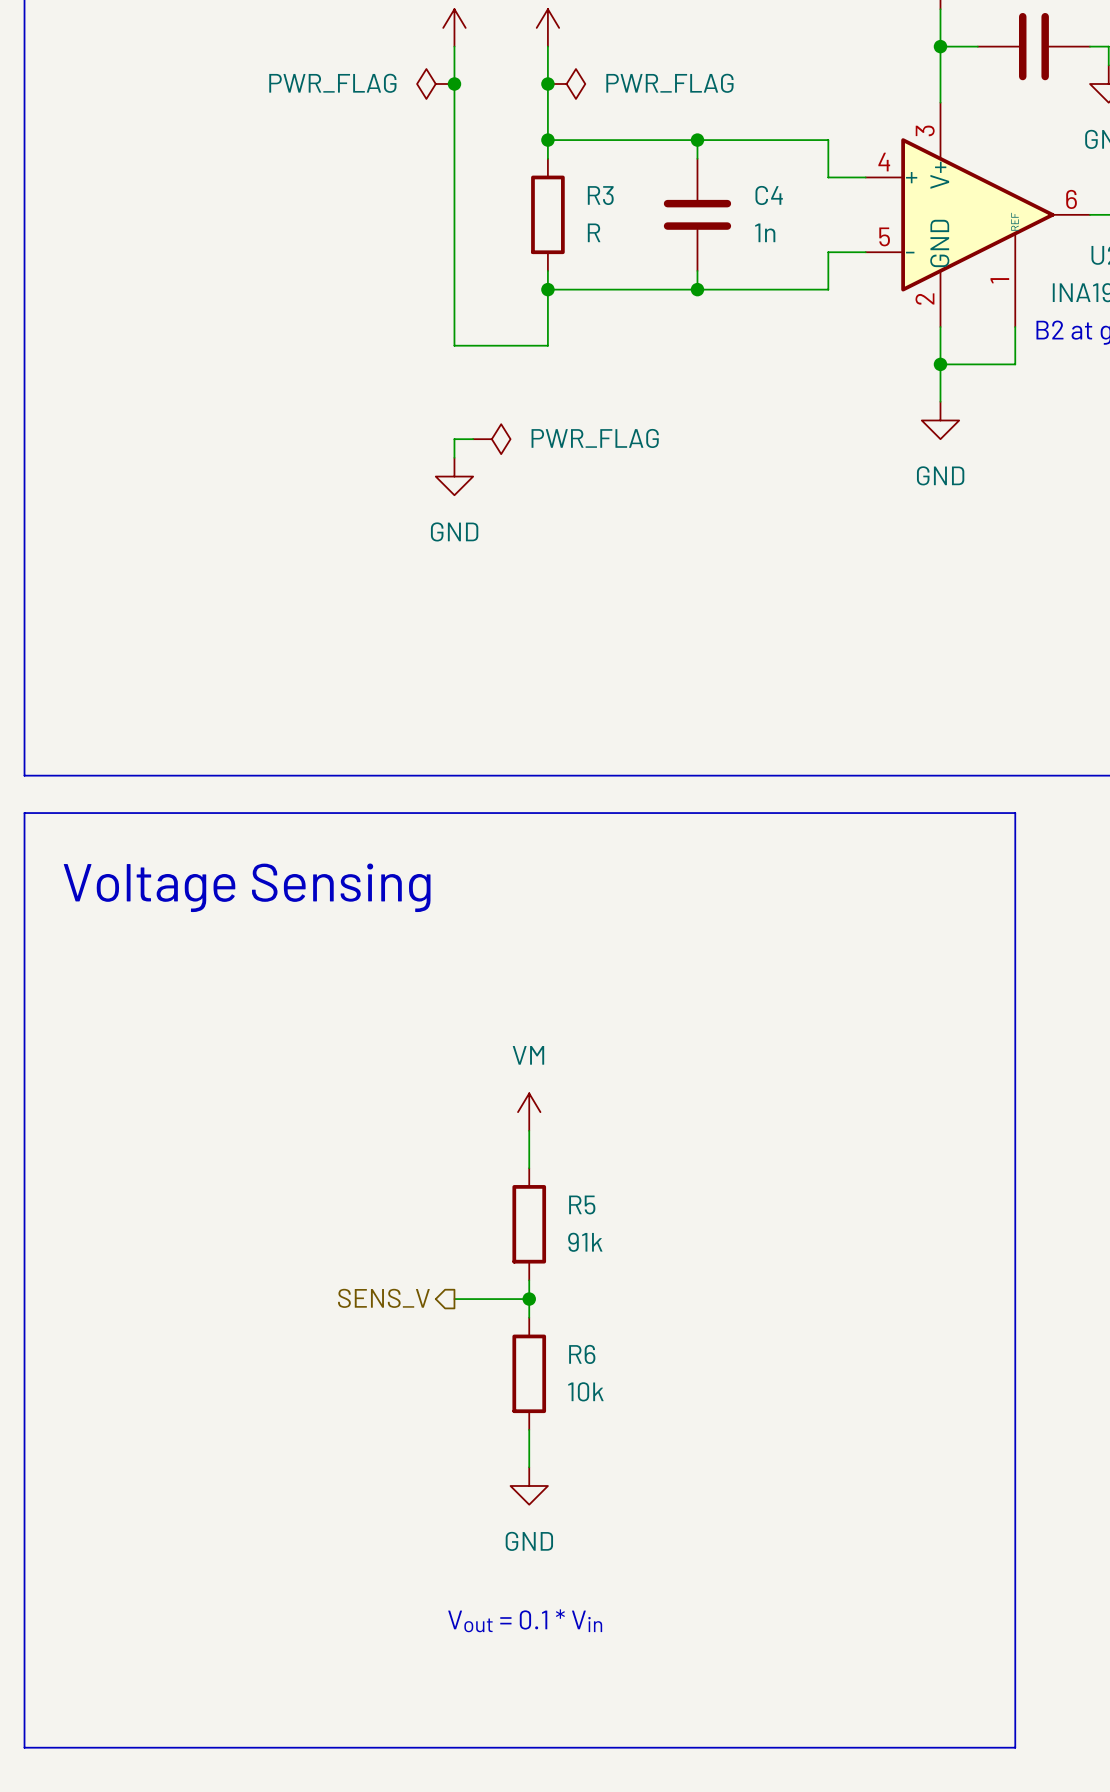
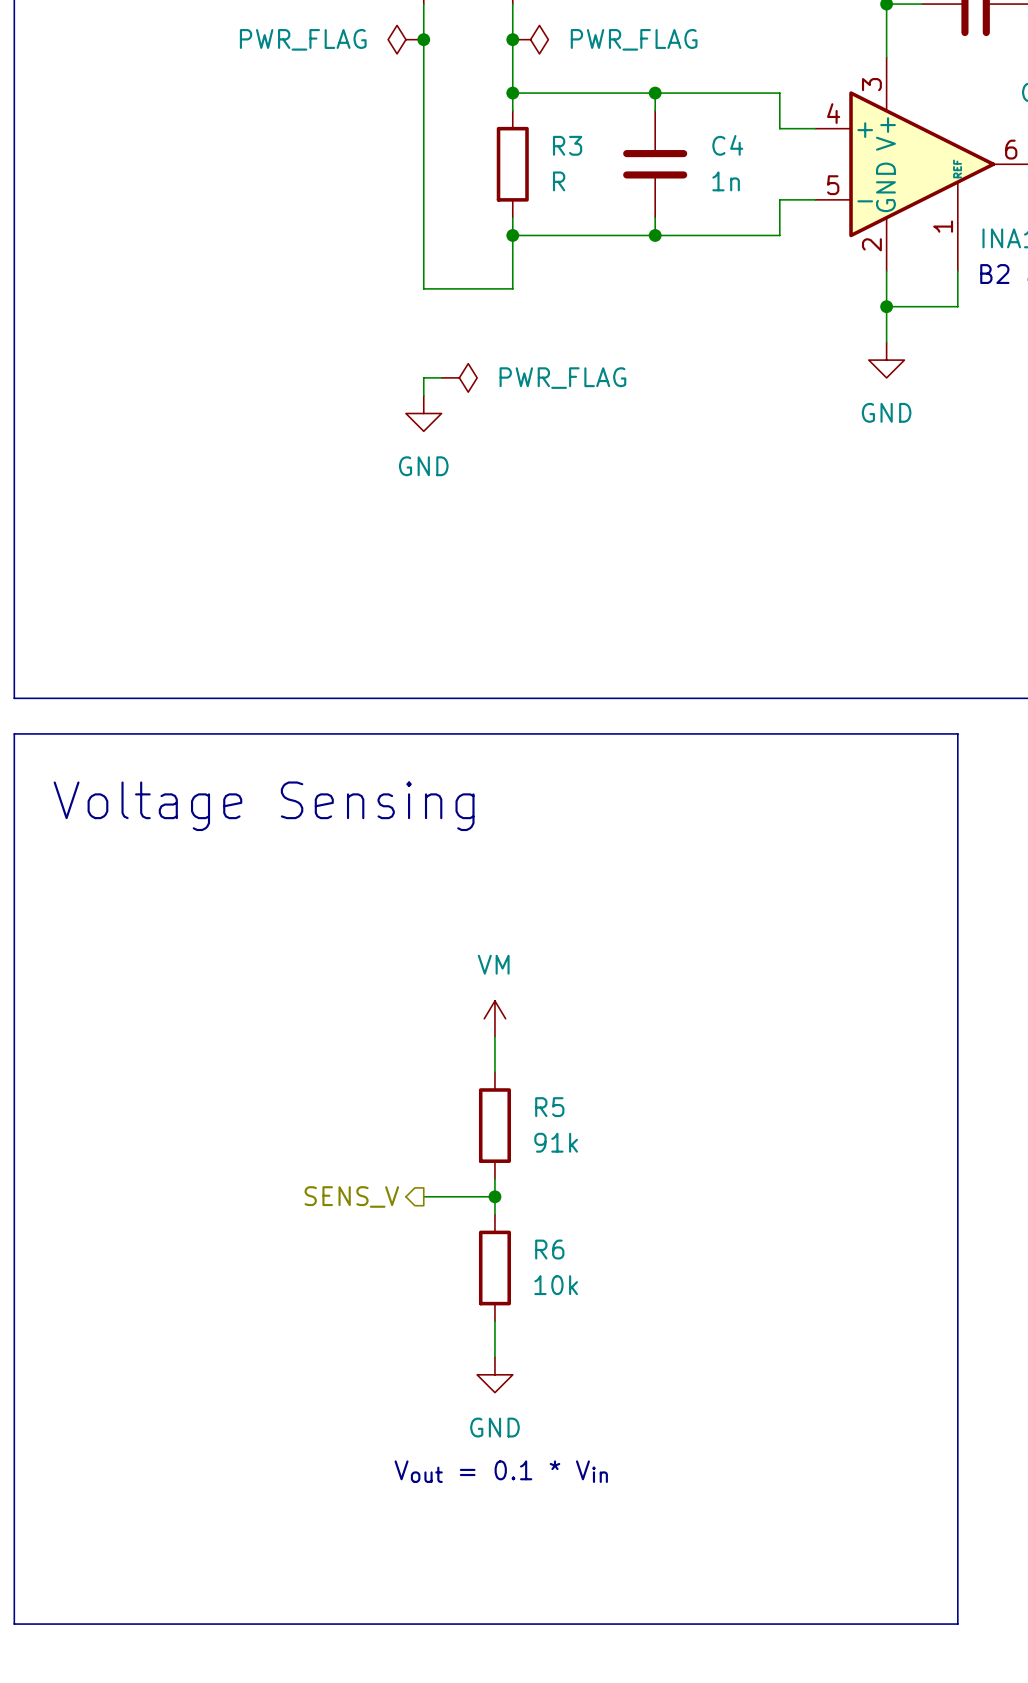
text position: Vout = 0.1 * Vin (525, 1620) -> Vout = 0.1 * Vin (501, 1471)

